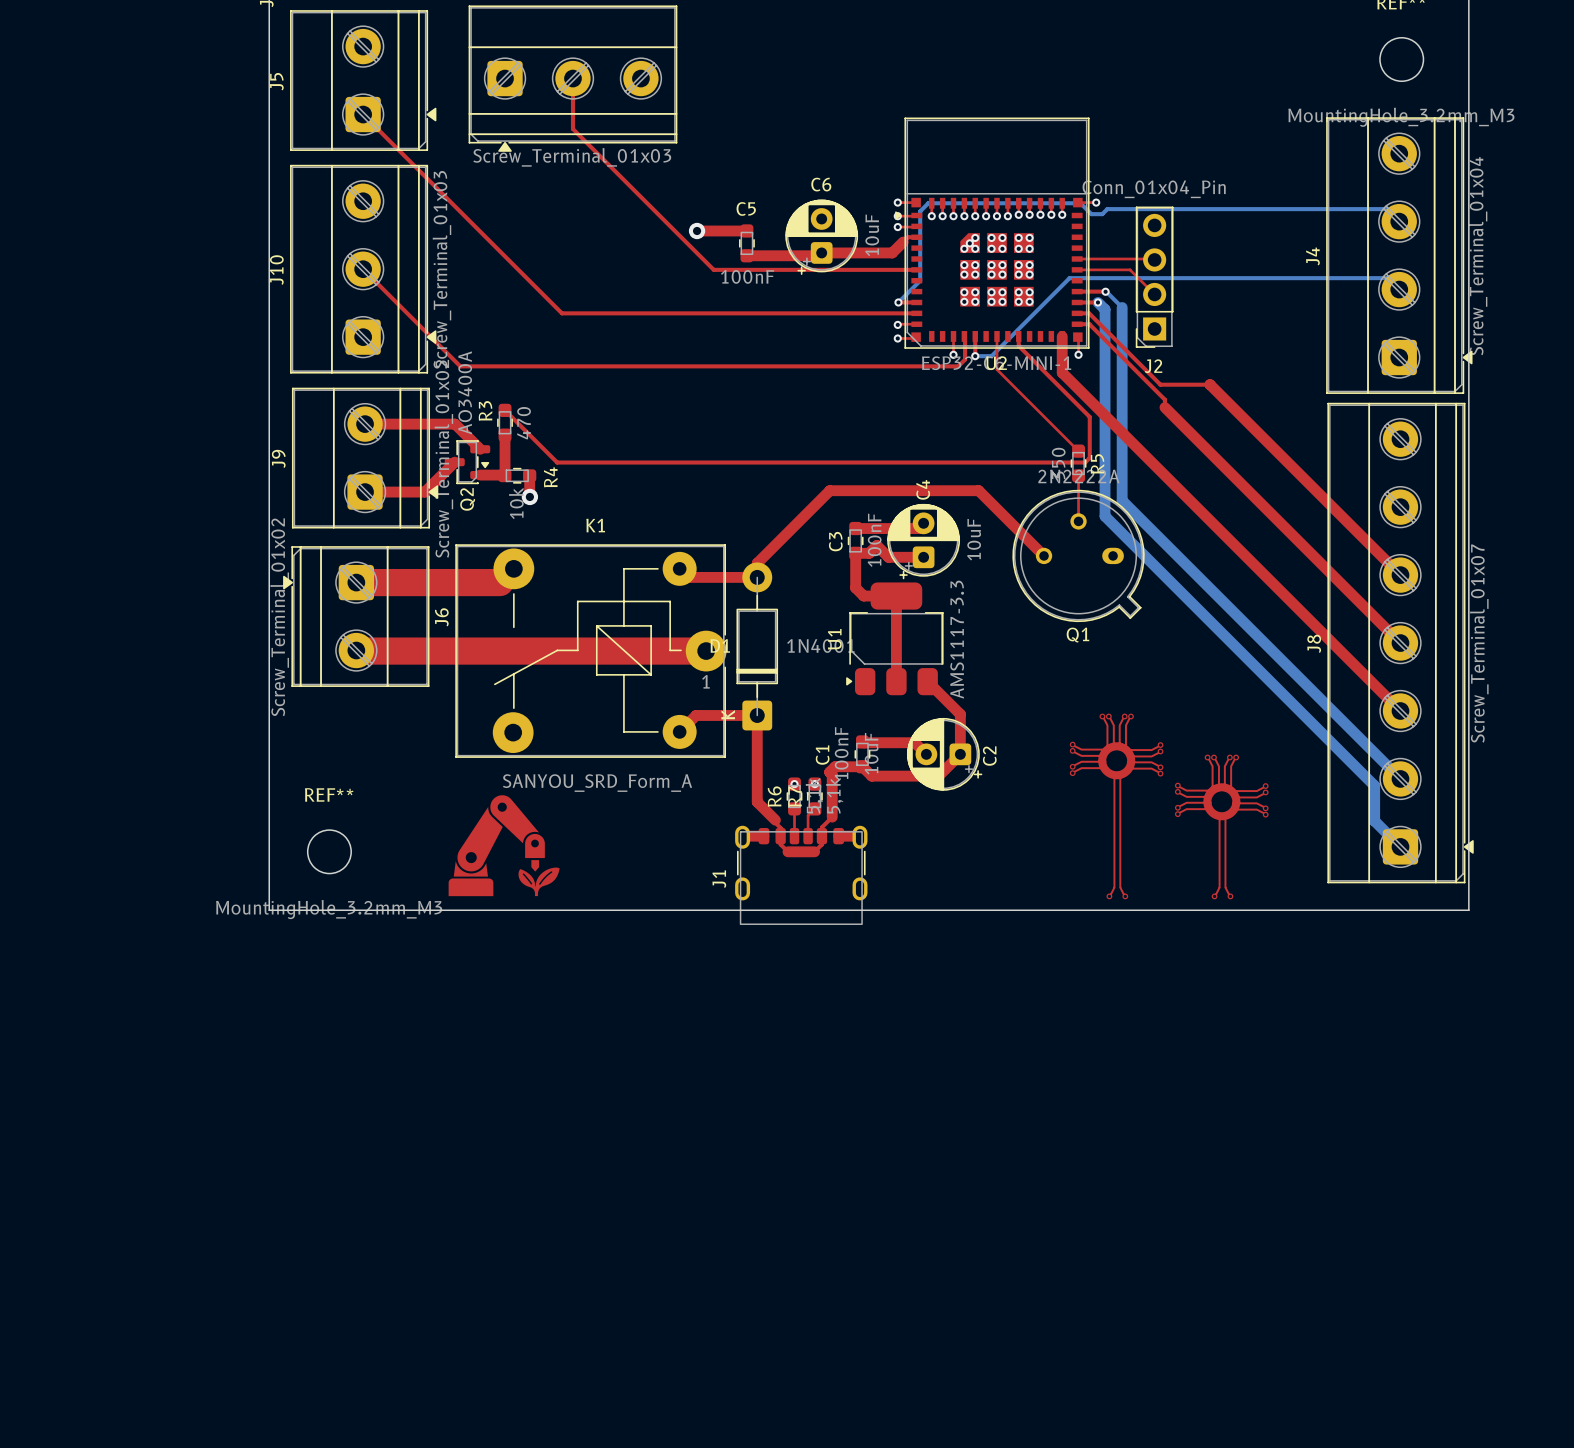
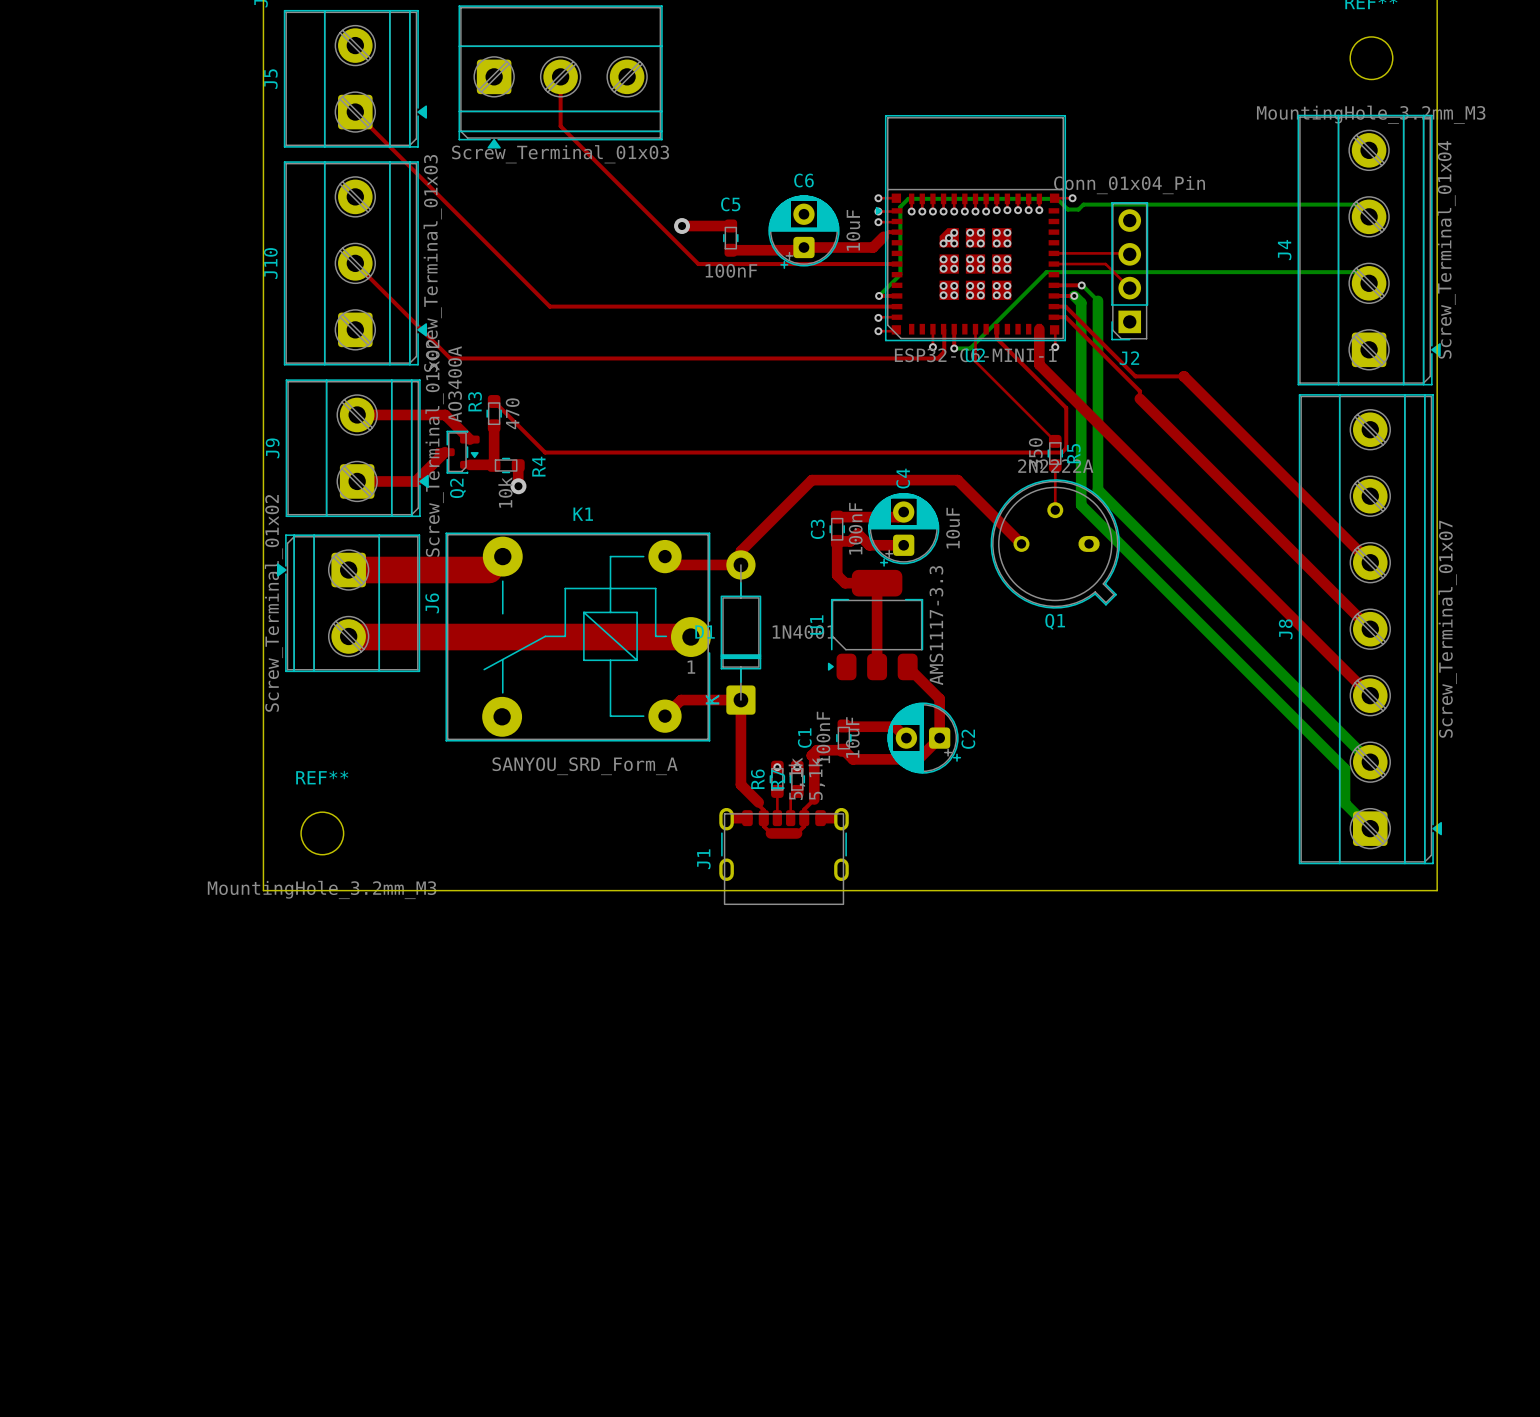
drawing: [1069, 713, 1269, 900] -> none
drawing: [448, 795, 560, 897] -> none

